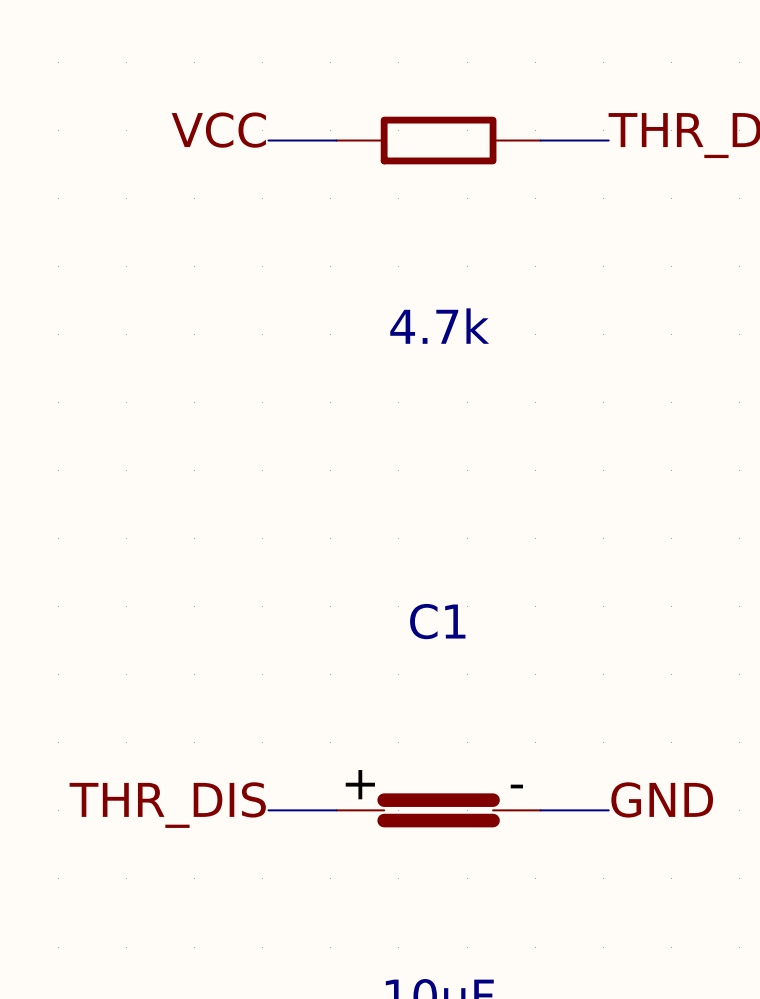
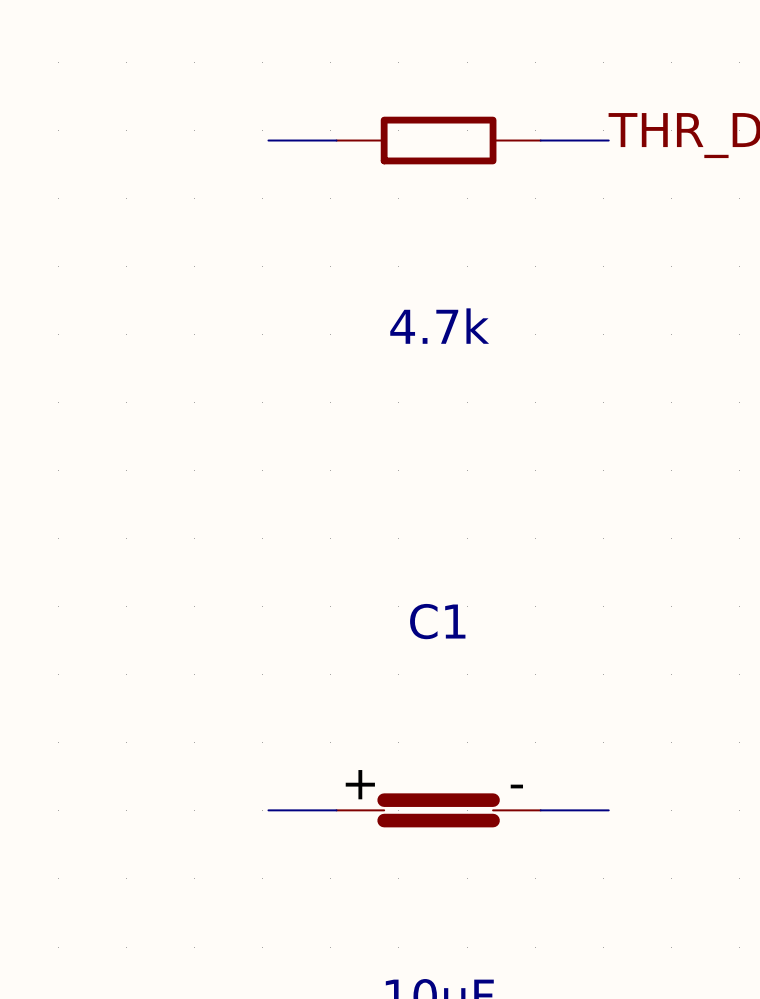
label: VCC (218, 130) -> none
label: GND (662, 799) -> none
label: THR_DIS (167, 805) -> none

